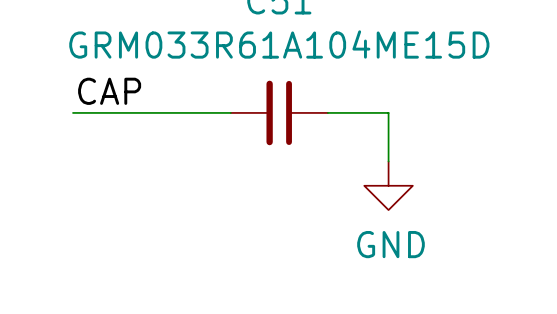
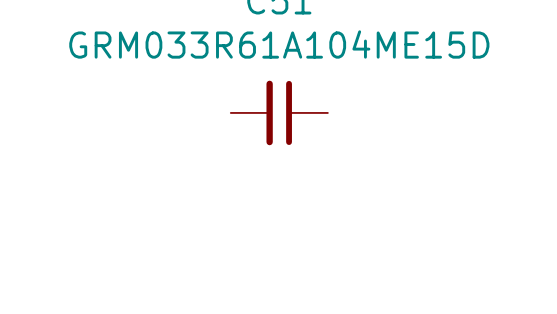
label: CAP (109, 91) -> none
wire: (73, 112) (230, 112) -> none
wire: (327, 112) (388, 112) (388, 161) -> none
power symbol: GND (388, 185) -> none

